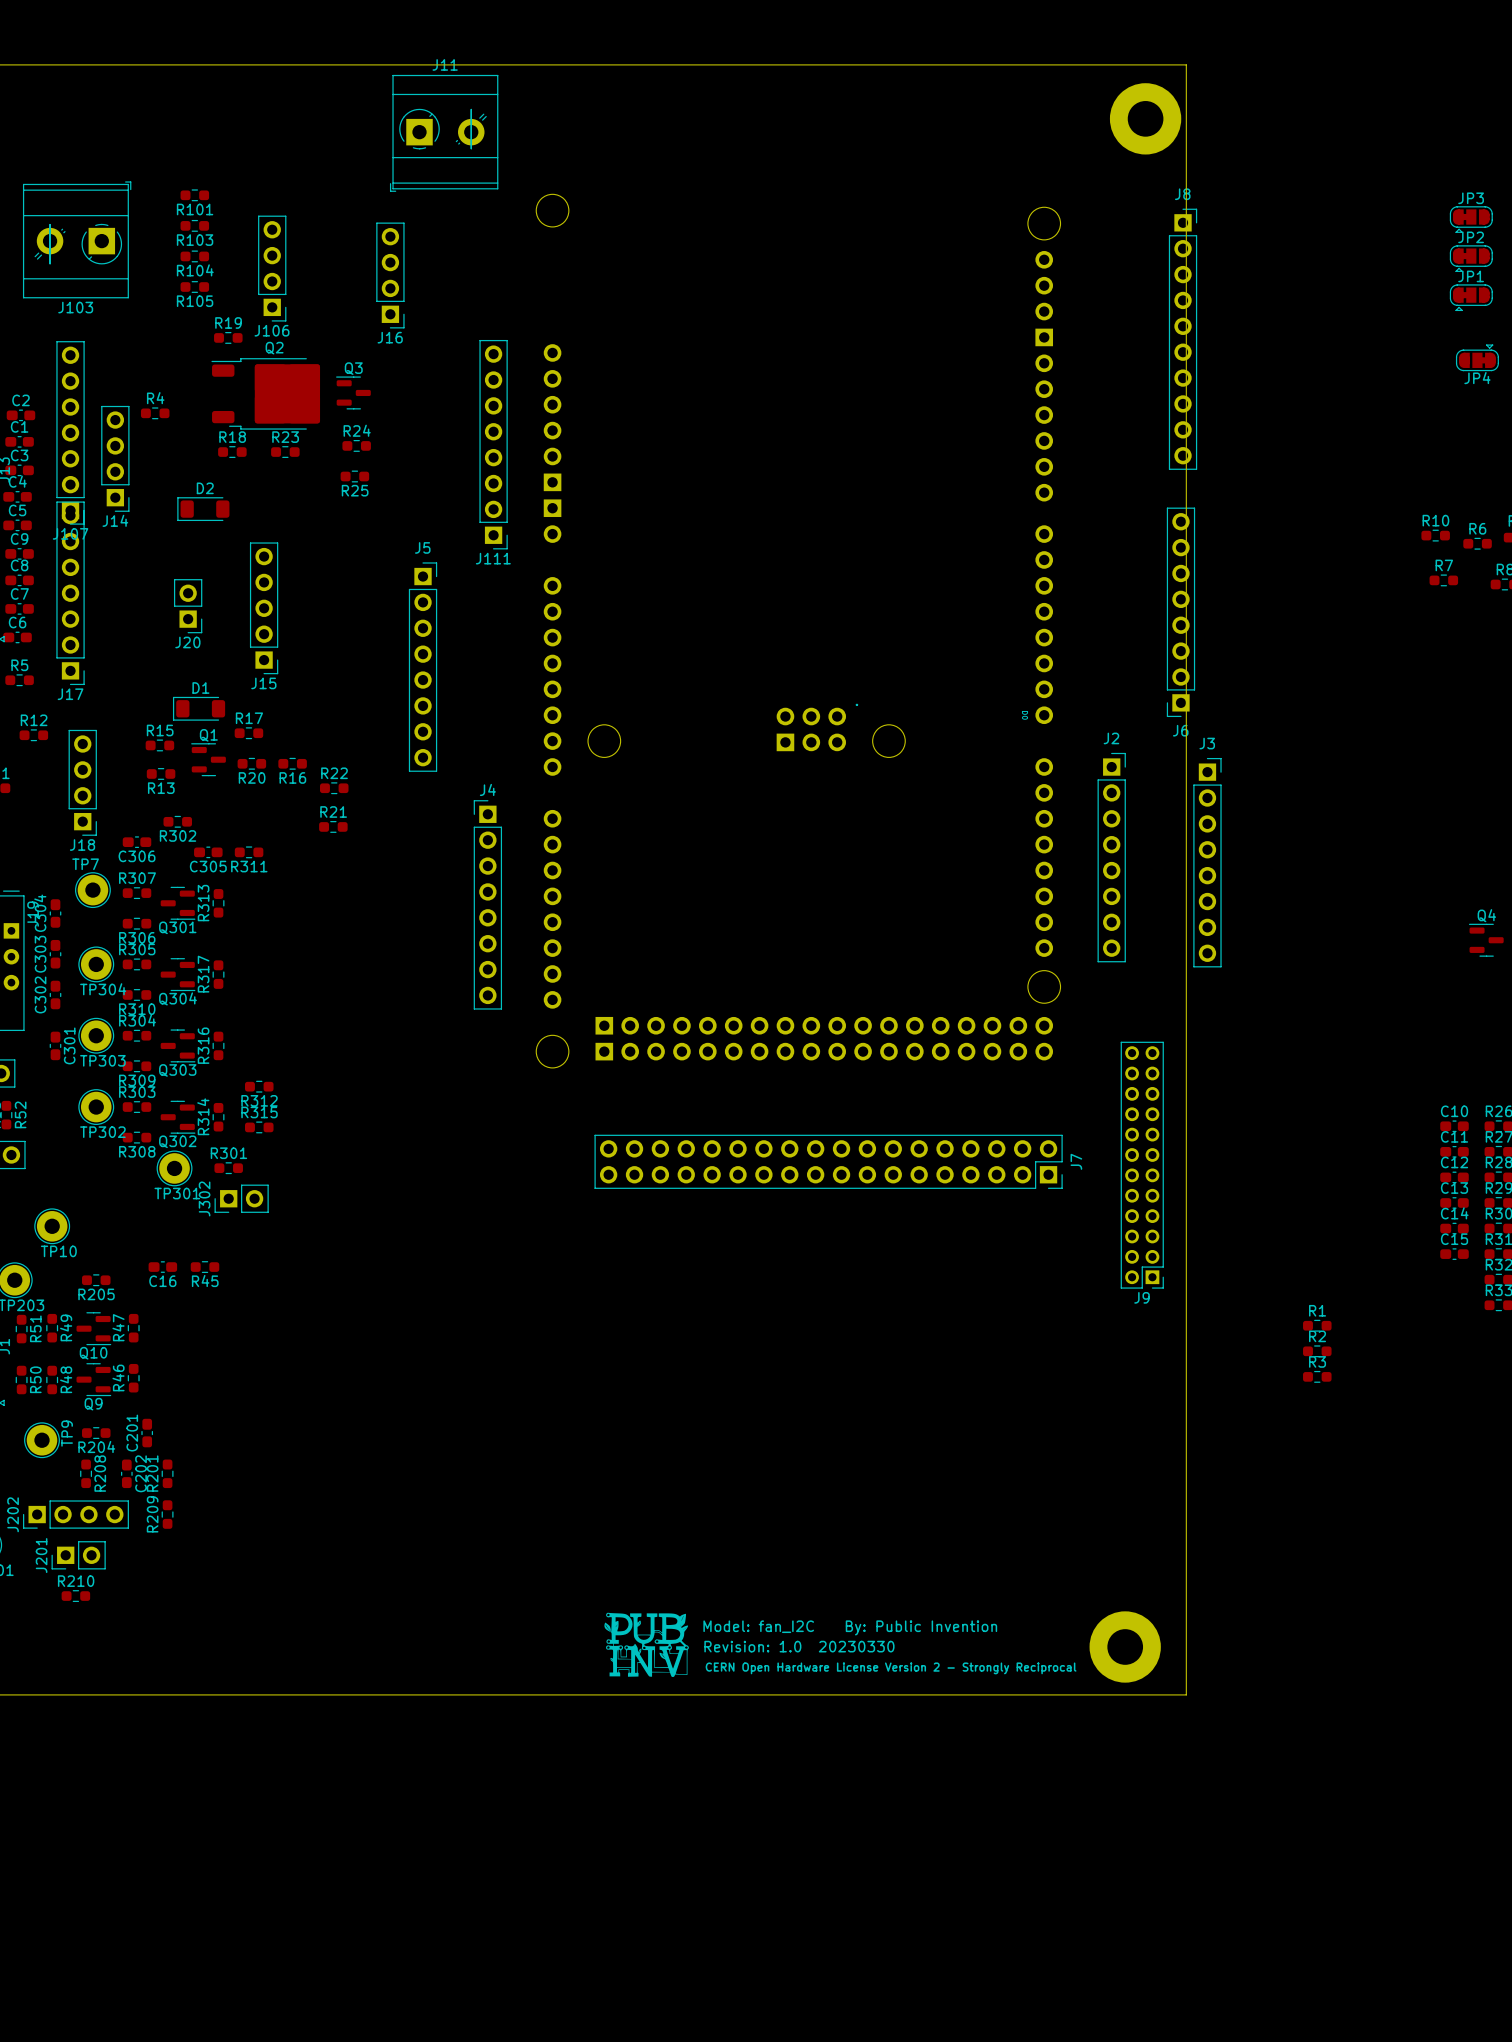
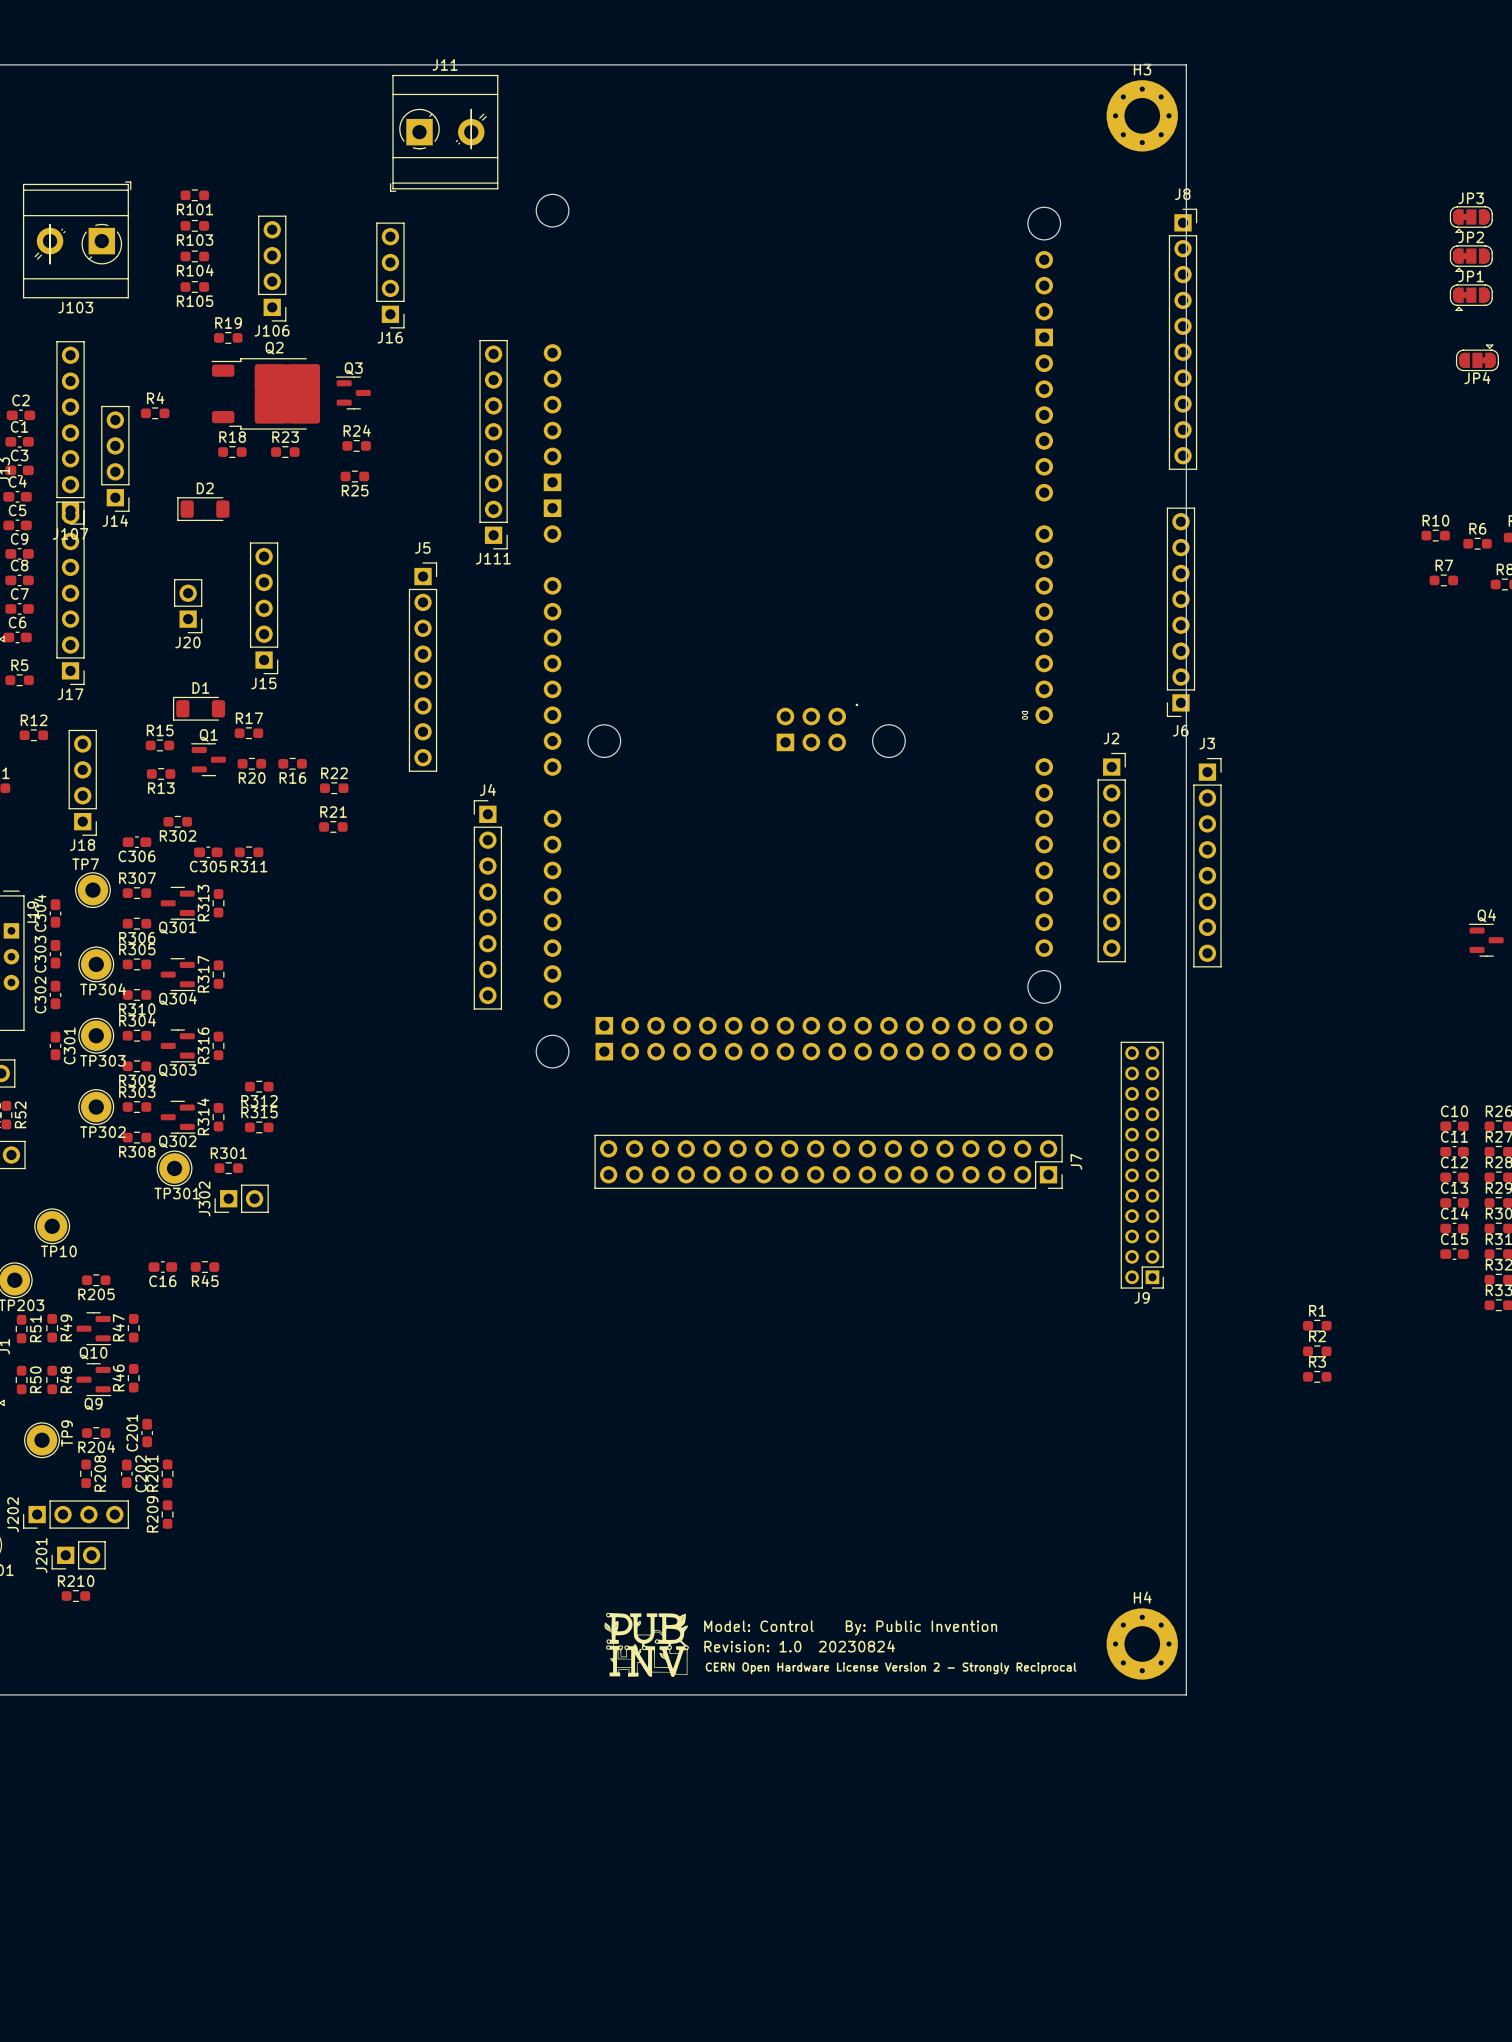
H3: none -> (1142, 115)
part: (1145, 118) -> none
text: Model: fan_I2C (758, 1626) -> Model: Control (758, 1626)
H4: none -> (1142, 1643)
text: Revision: 1.0 20230330 (799, 1646) -> Revision: 1.0 20230824 (799, 1646)
part: (1125, 1646) -> none

